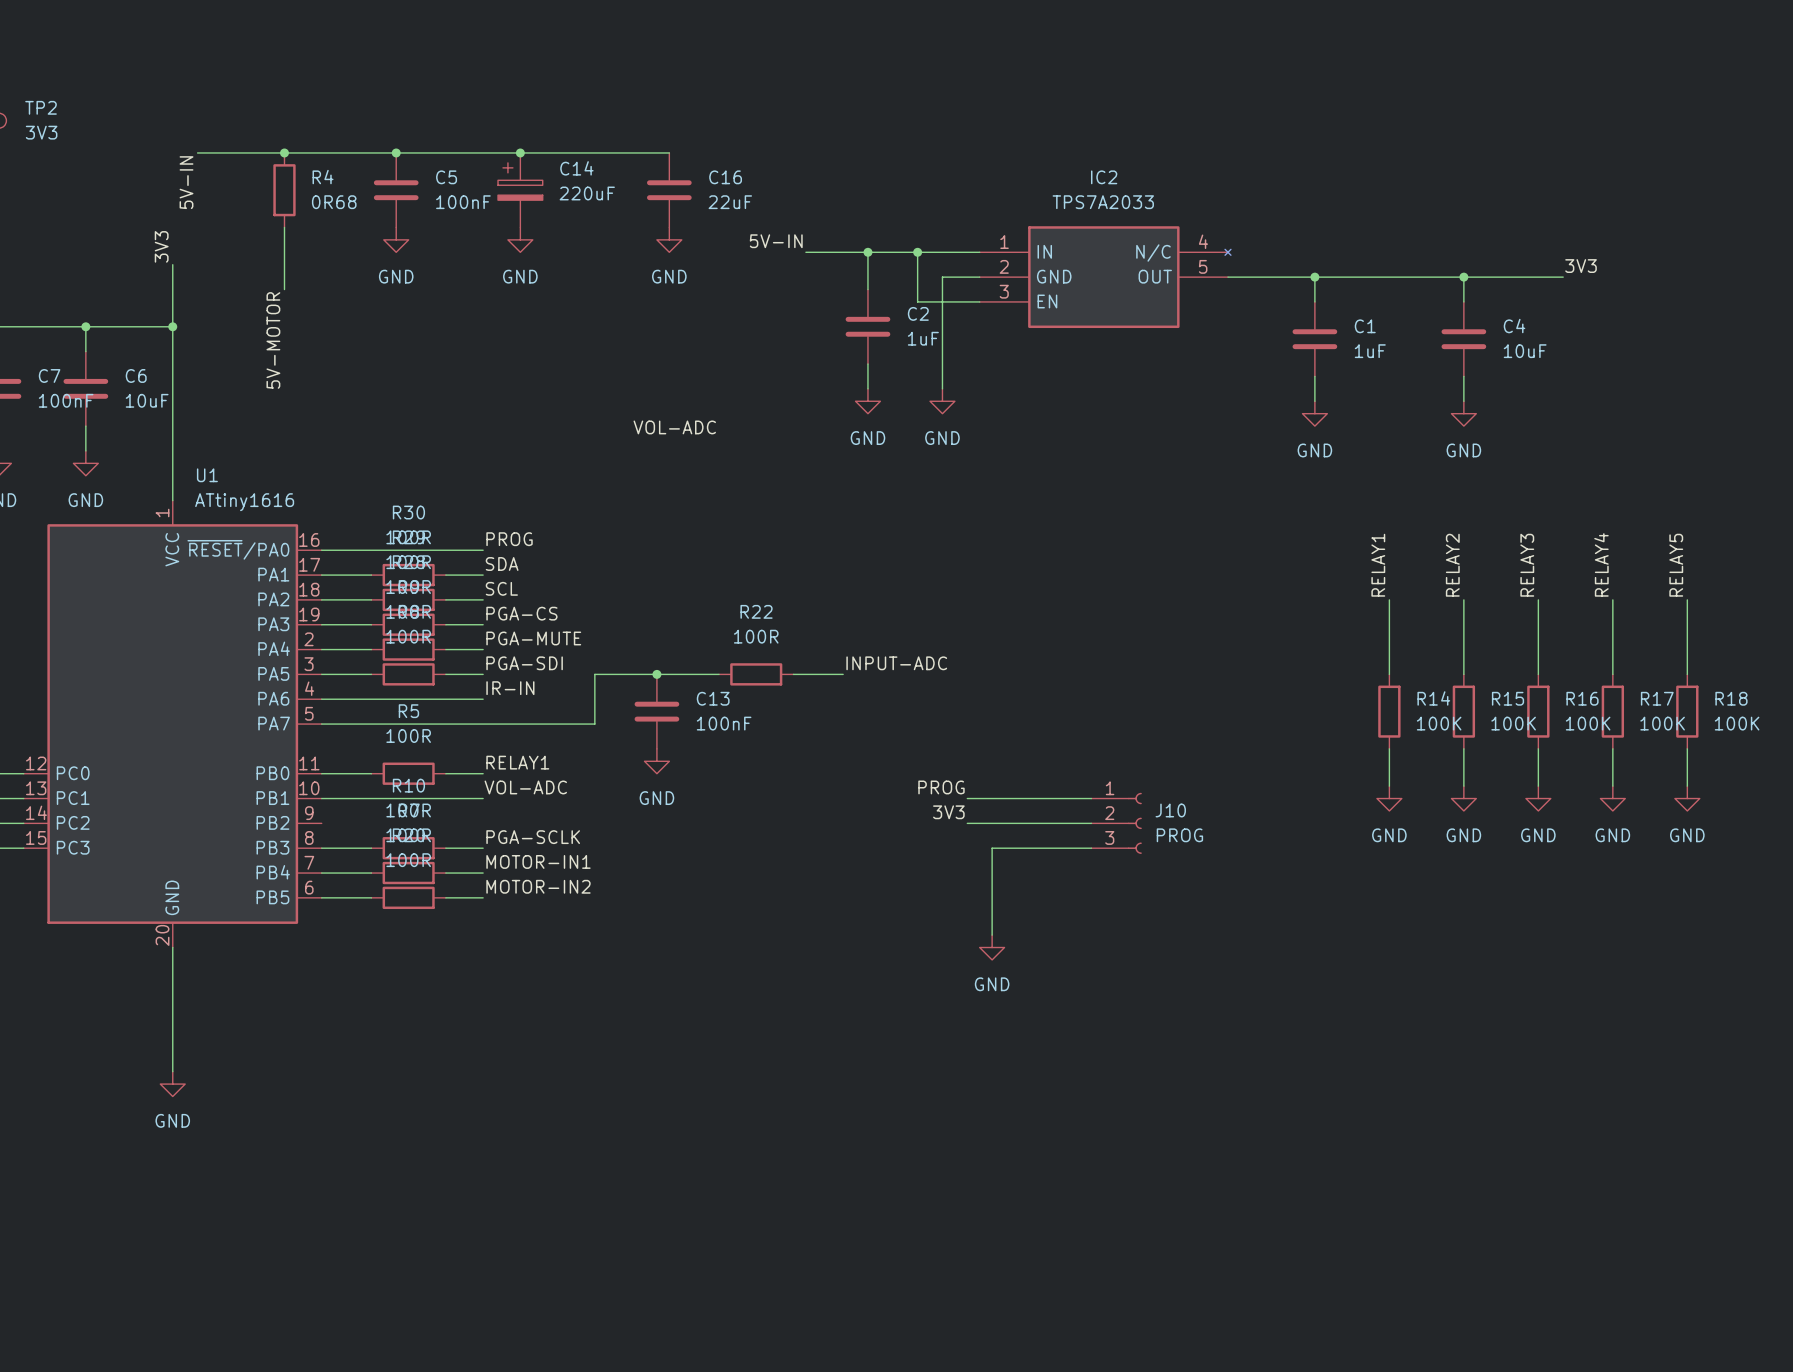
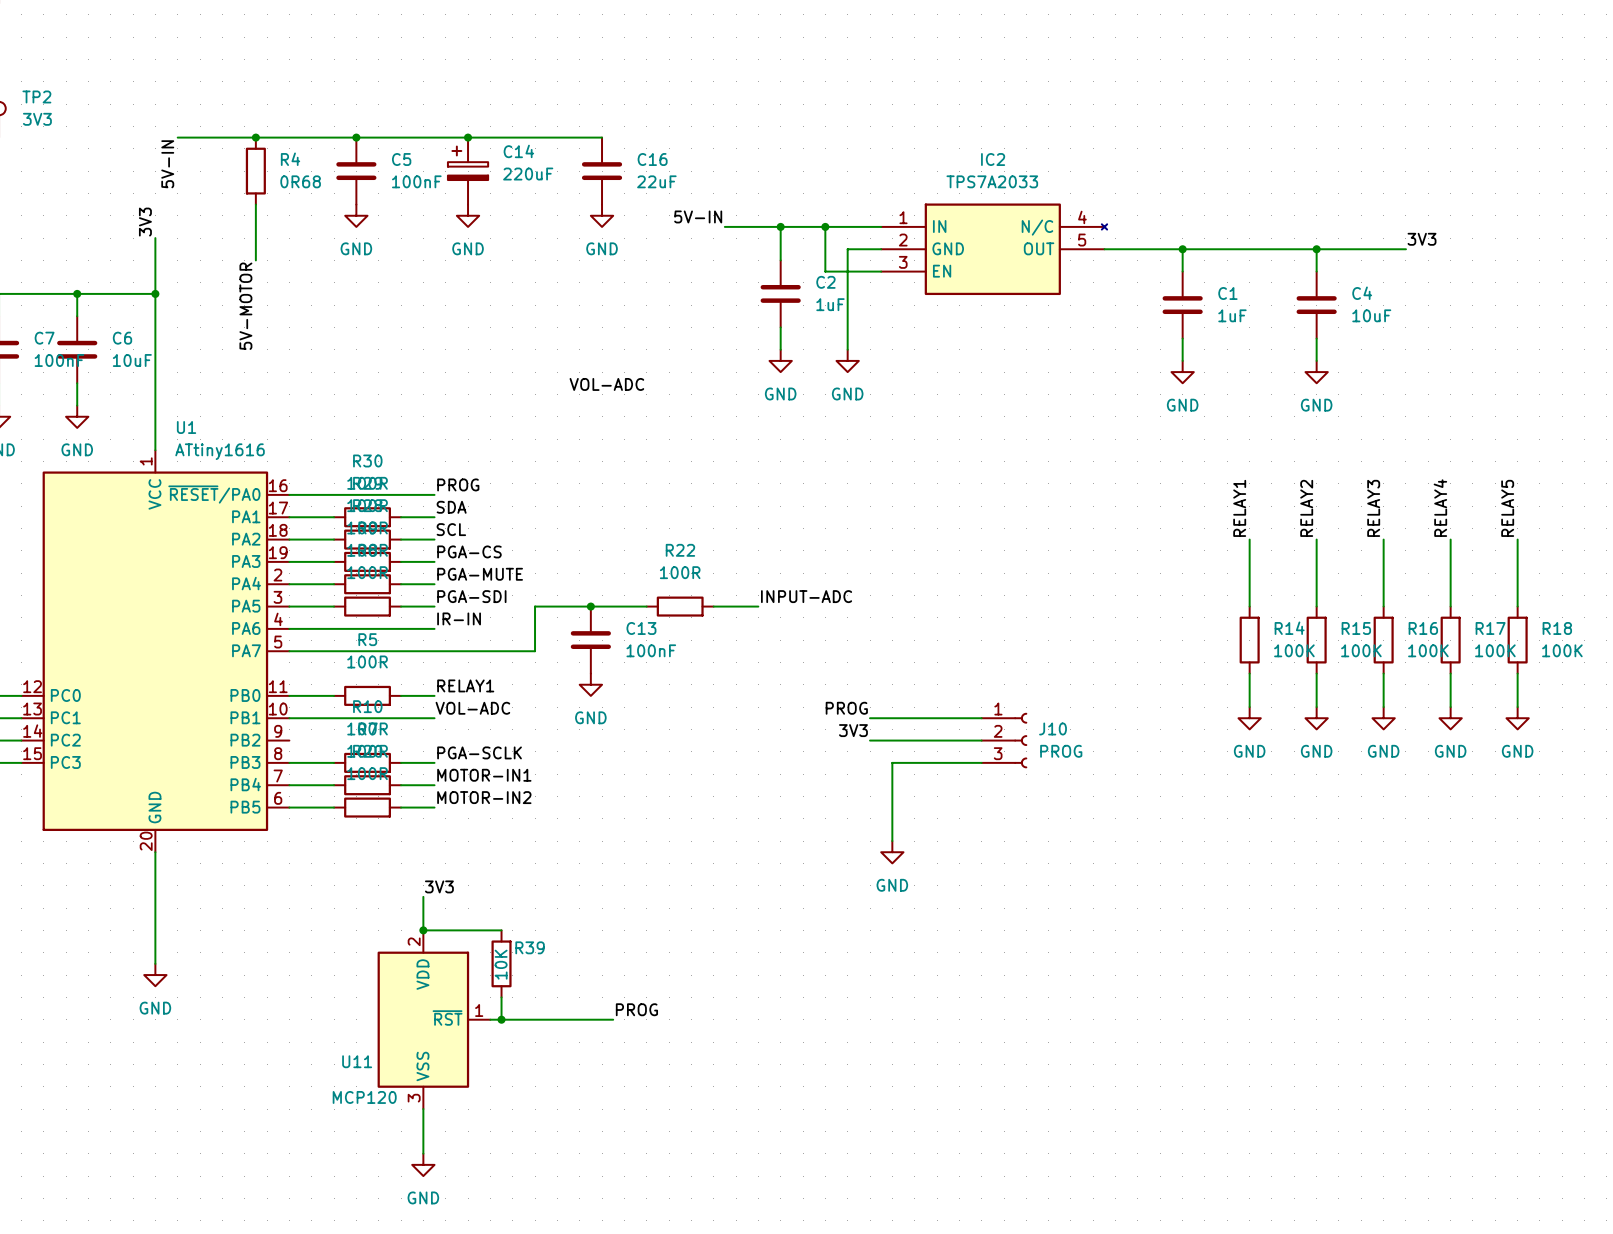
label: none -> 3V3 (439, 886)
wire: none -> (423, 896) (423, 930) (501, 930)
junction: none -> (423, 930)
R39: none -> 10K (501, 963)
wire: none -> (501, 997) (501, 1019)
label: none -> PROG (636, 1009)
U11: none -> MCP120 (433, 1019)
wire: none -> (490, 1019) (613, 1019)
junction: none -> (501, 1019)
wire: none -> (423, 1109) (423, 1153)
power symbol: none -> GND (423, 1164)

